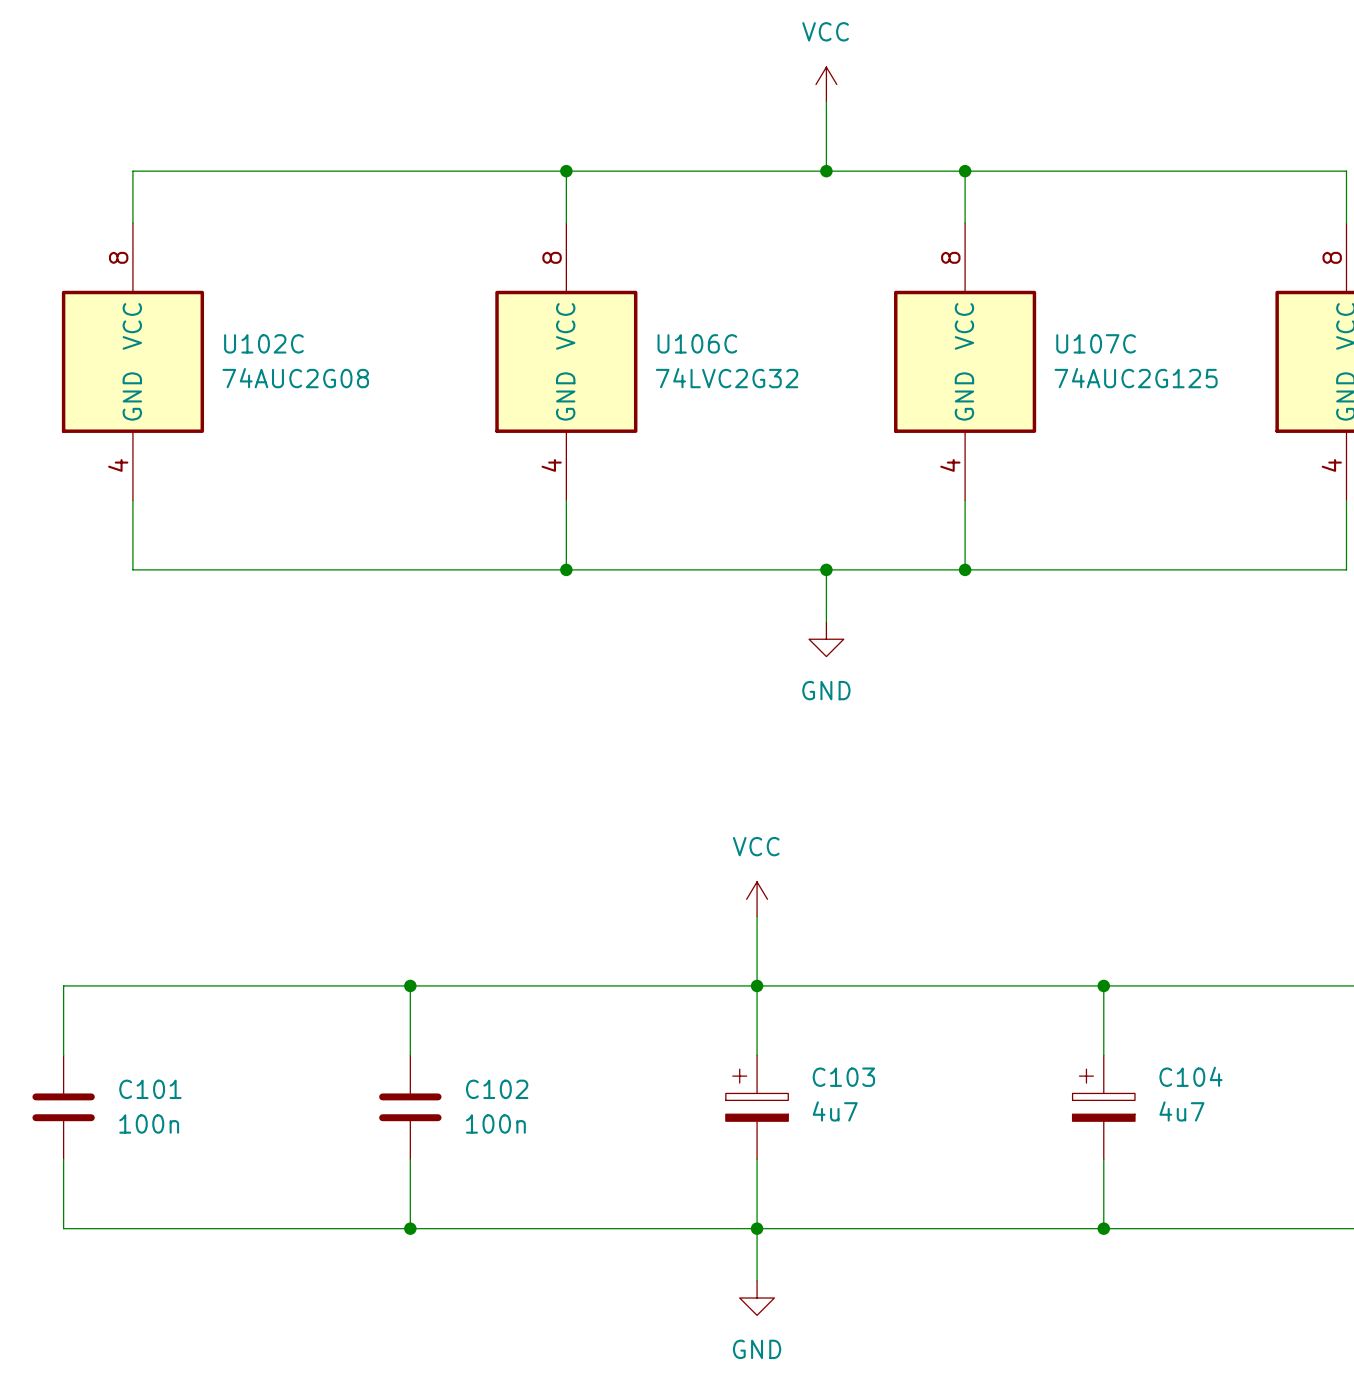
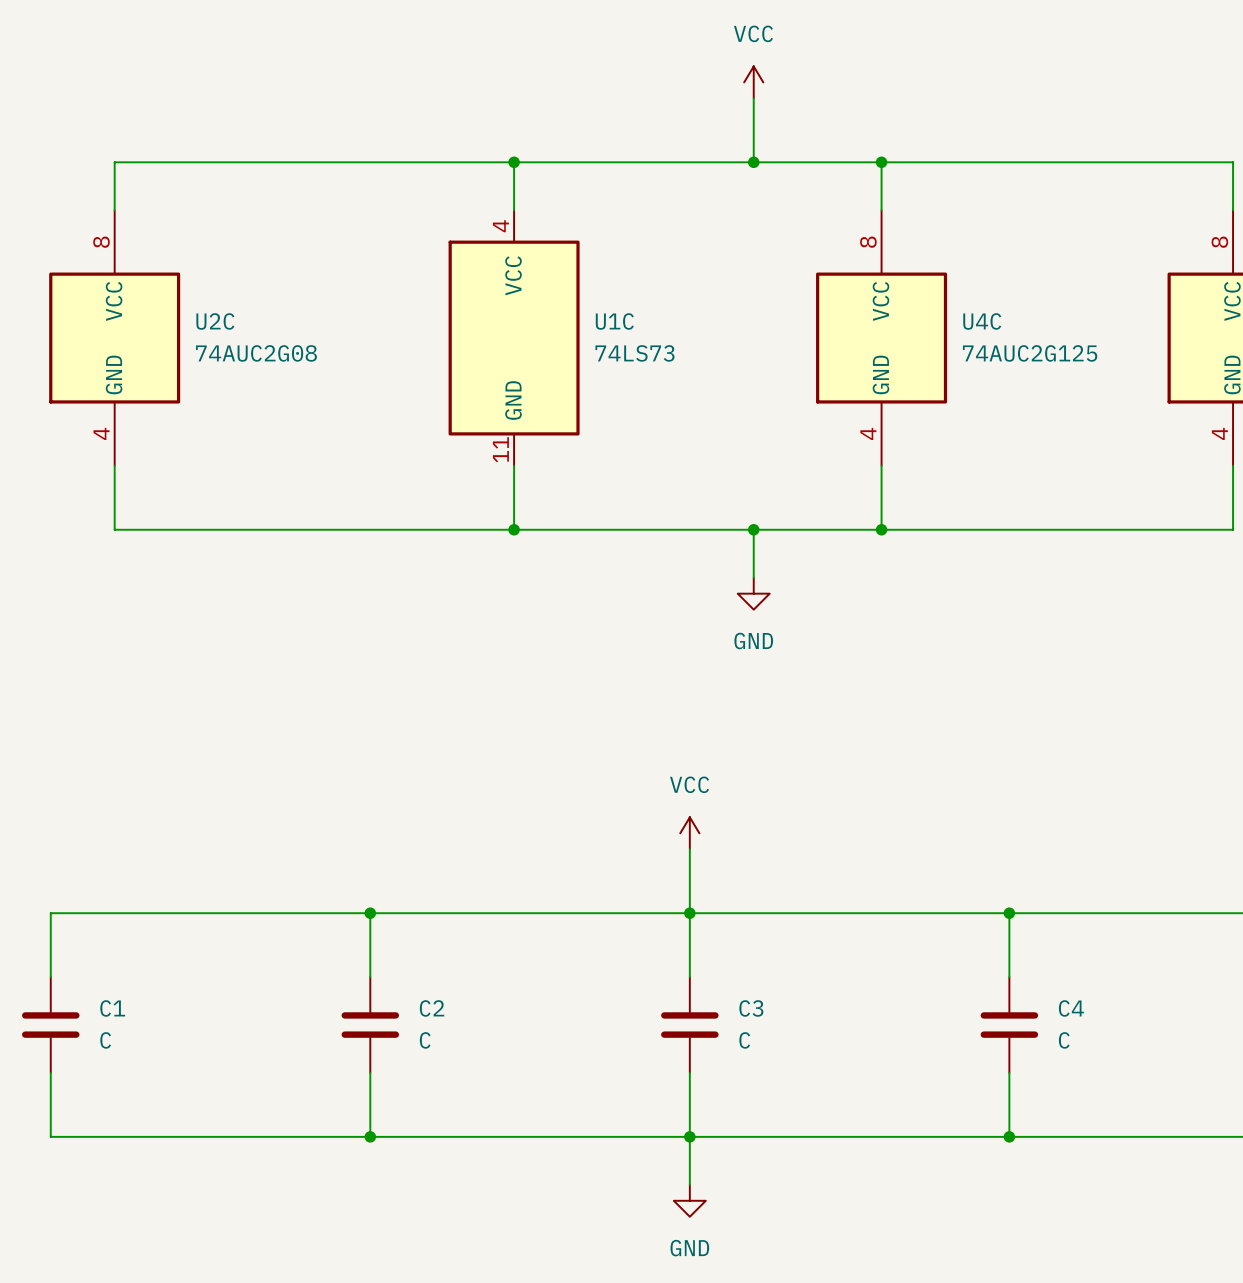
U102C name: U102C (263, 343) -> U2C (215, 321)
U107C name: U107C (1096, 343) -> U4C (982, 321)
U106C: 74LVC2G32 (566, 361) -> none
U1C: none -> 74LS73 (514, 338)
C101 name: C101 (150, 1089) -> C1 (112, 1008)
C102 name: C102 (497, 1089) -> C2 (432, 1008)
C103: 4u7 (757, 1107) -> none
C3: none -> C (689, 1025)
C104: 4u7 (1103, 1107) -> none
C4: none -> C (1009, 1025)
C101 value: 100n (149, 1124) -> C (105, 1040)
C102 value: 100n (495, 1124) -> C (425, 1040)

